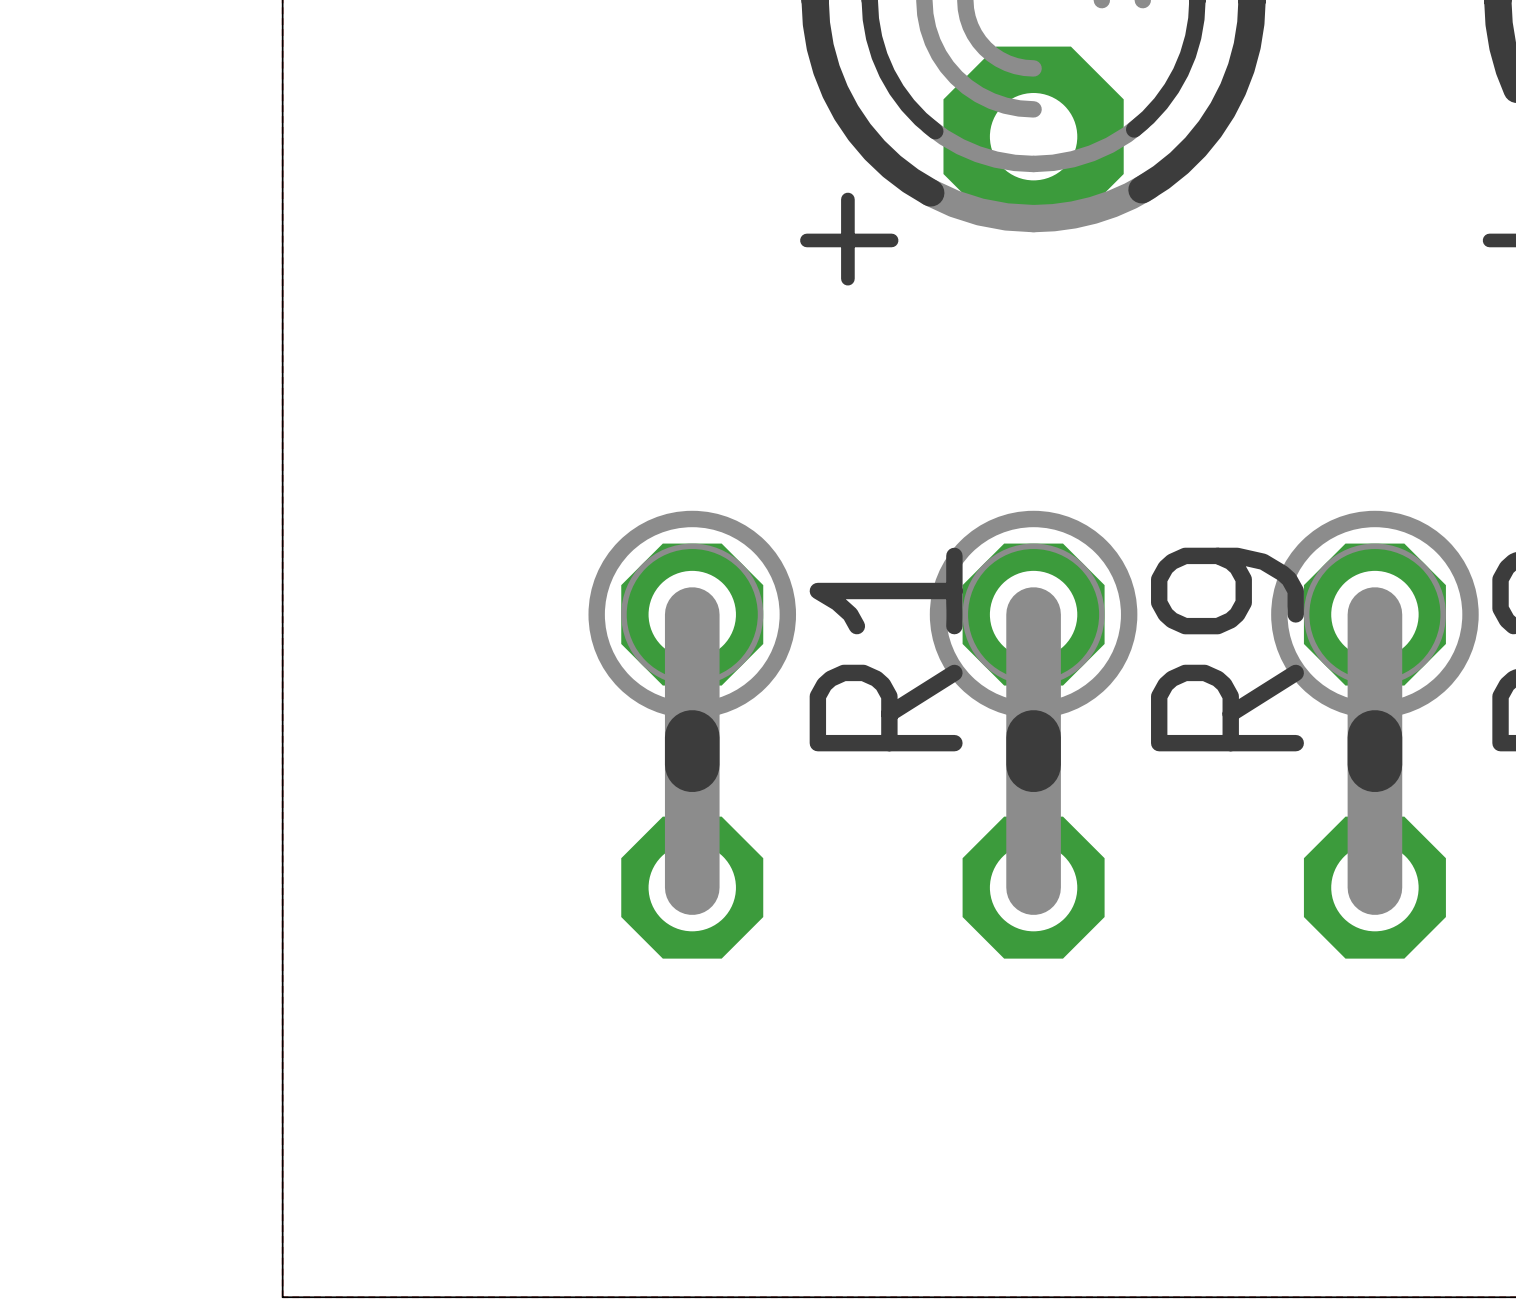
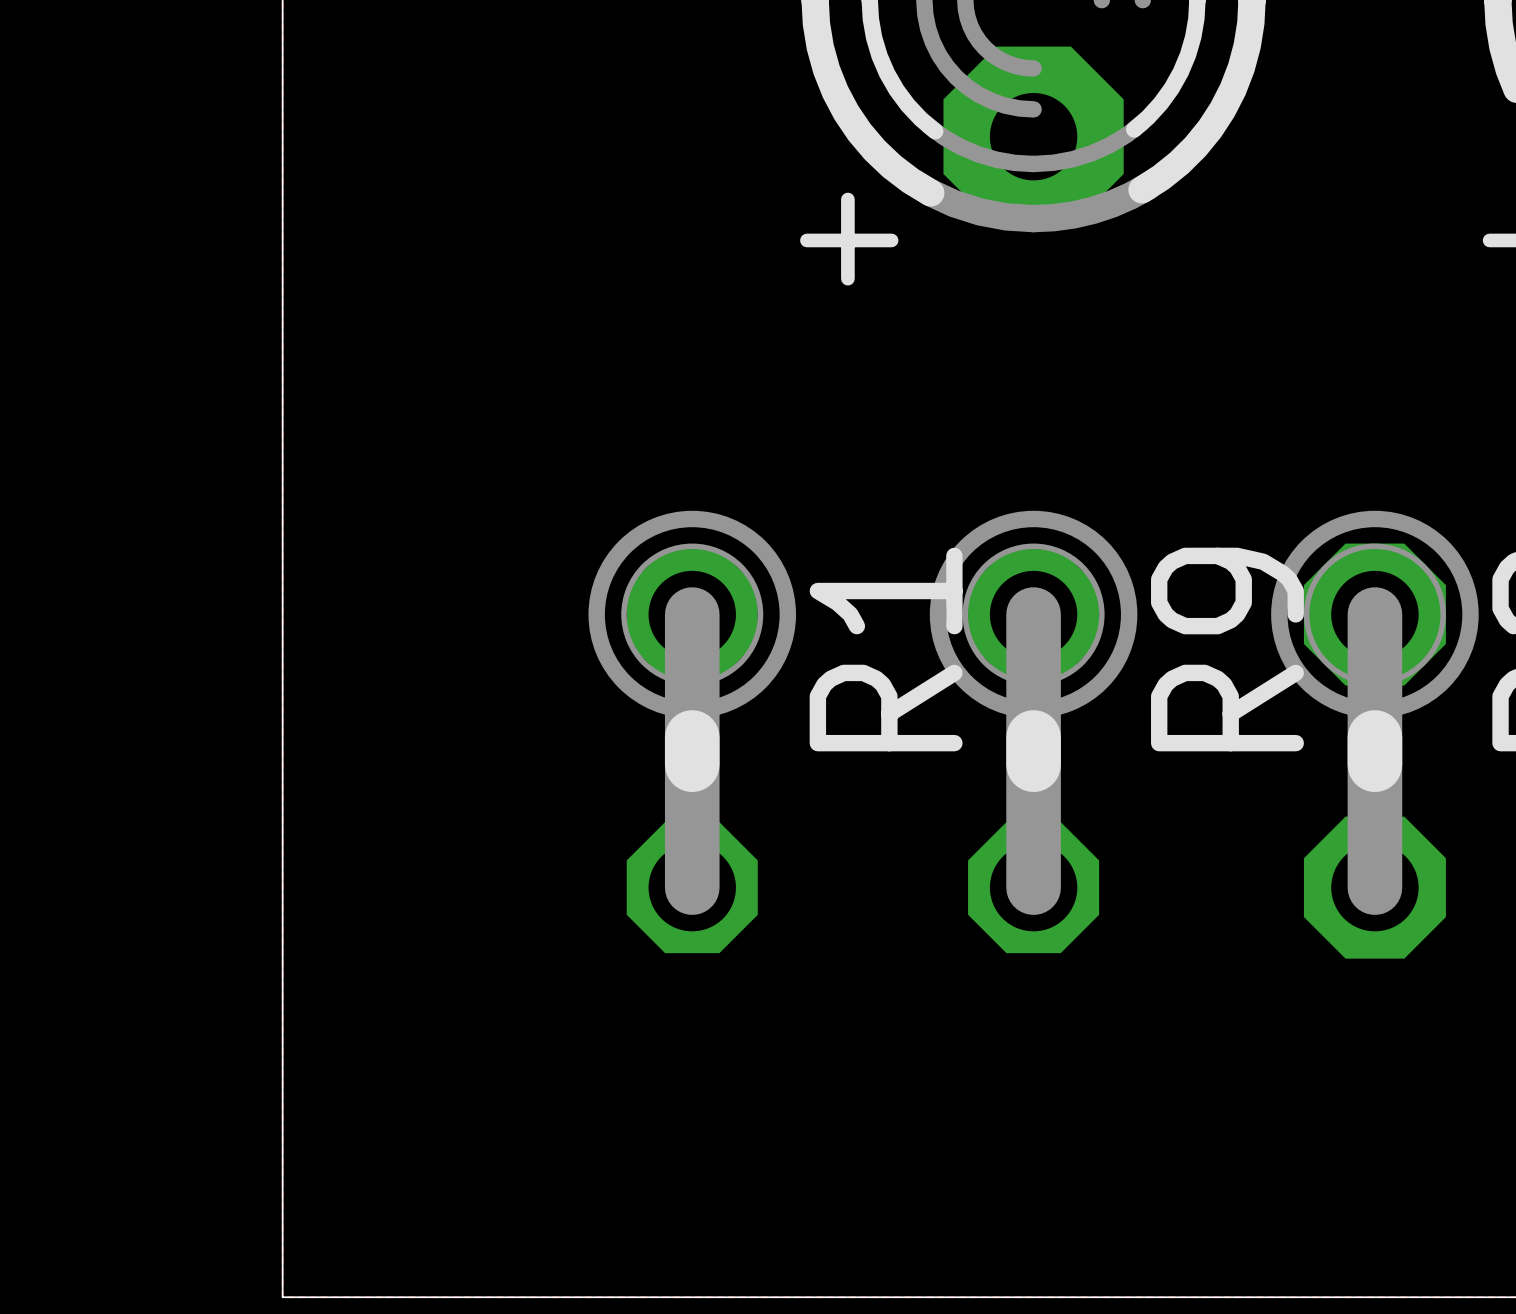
R1 footprint: [588, 510, 797, 959] -> [588, 510, 797, 954]
R9 footprint: [929, 510, 1138, 959] -> [929, 510, 1138, 954]

